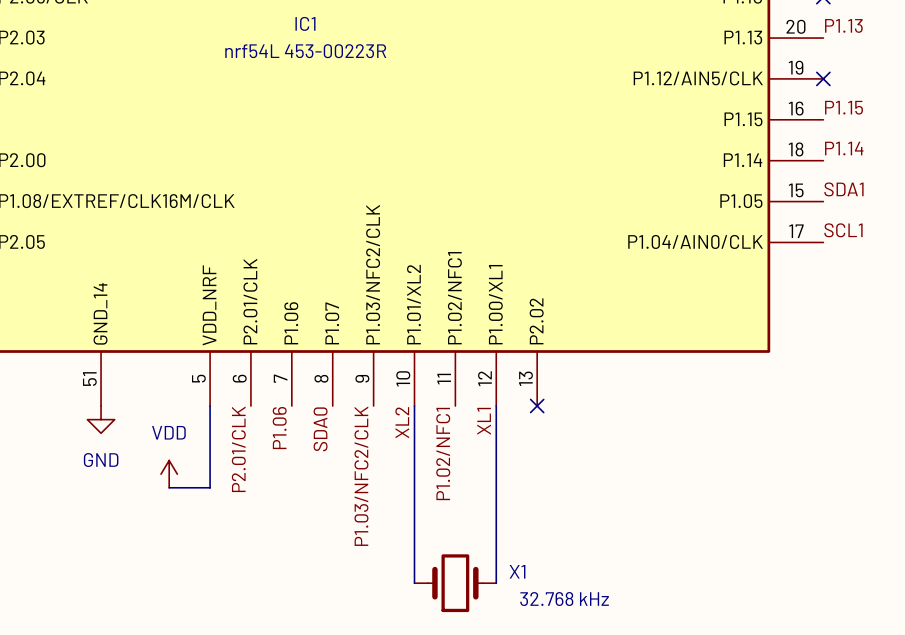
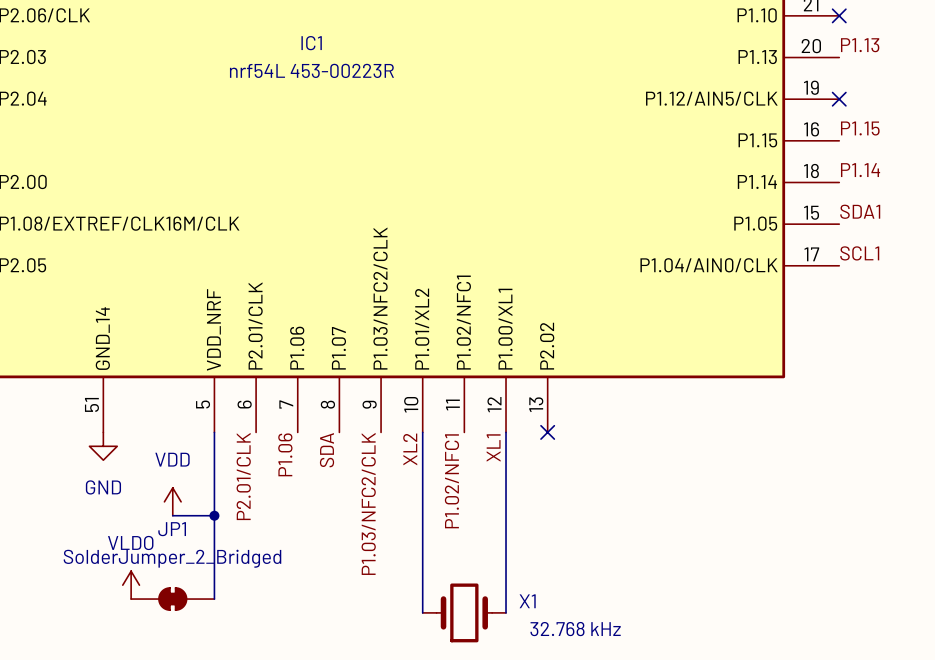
label: SDA0 (320, 429) -> SDA (327, 450)
wire: none -> (214, 515) (214, 599)
junction: none -> (214, 515)
power symbol: none -> VLDO (131, 585)
JP1: none -> SolderJumper_2_Bridged (172, 599)

